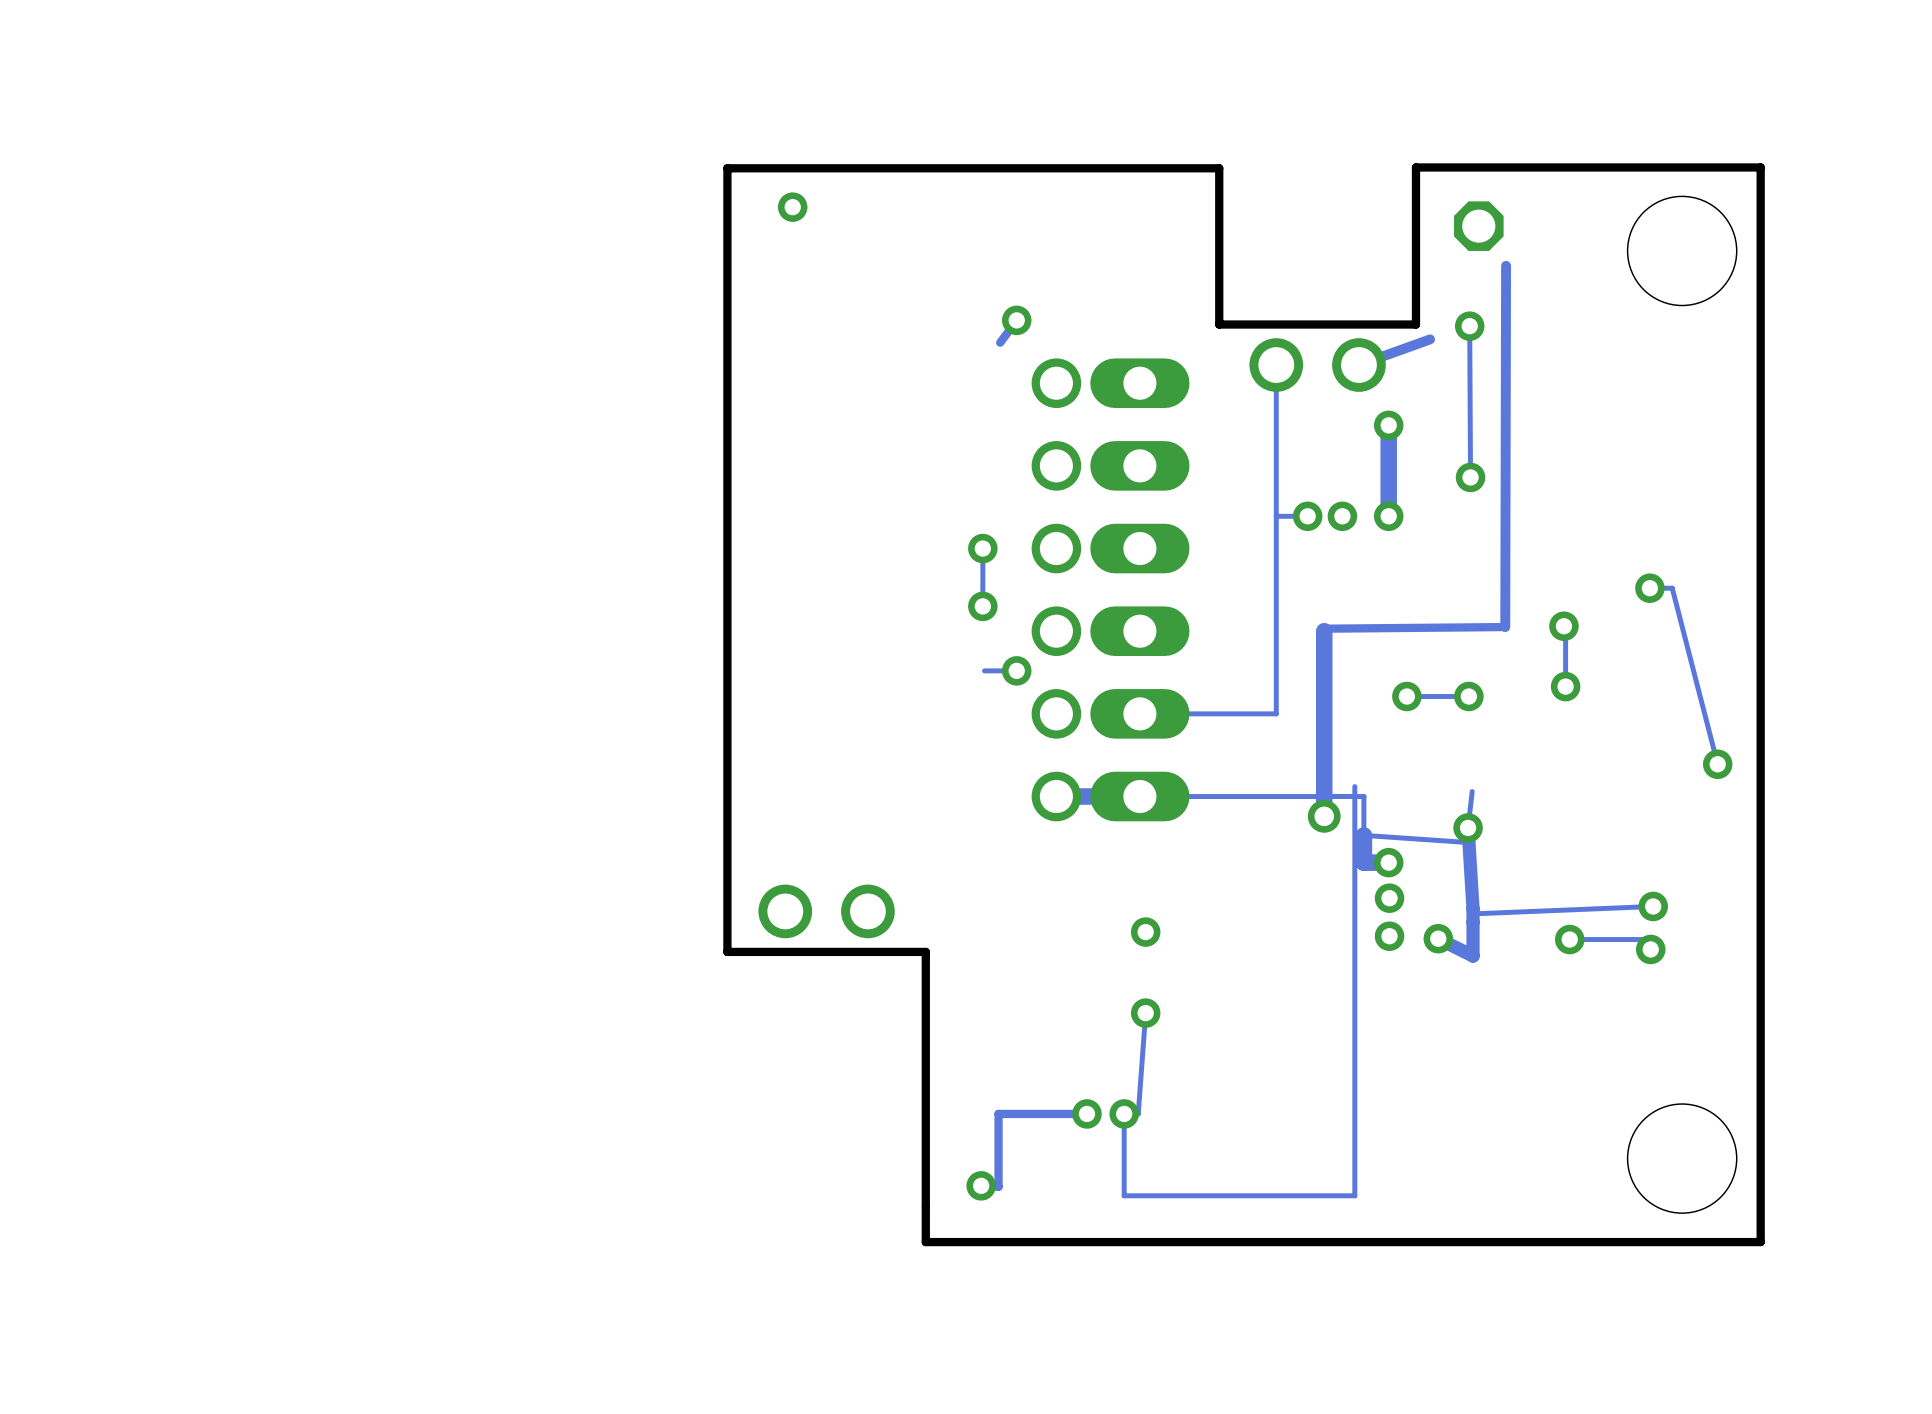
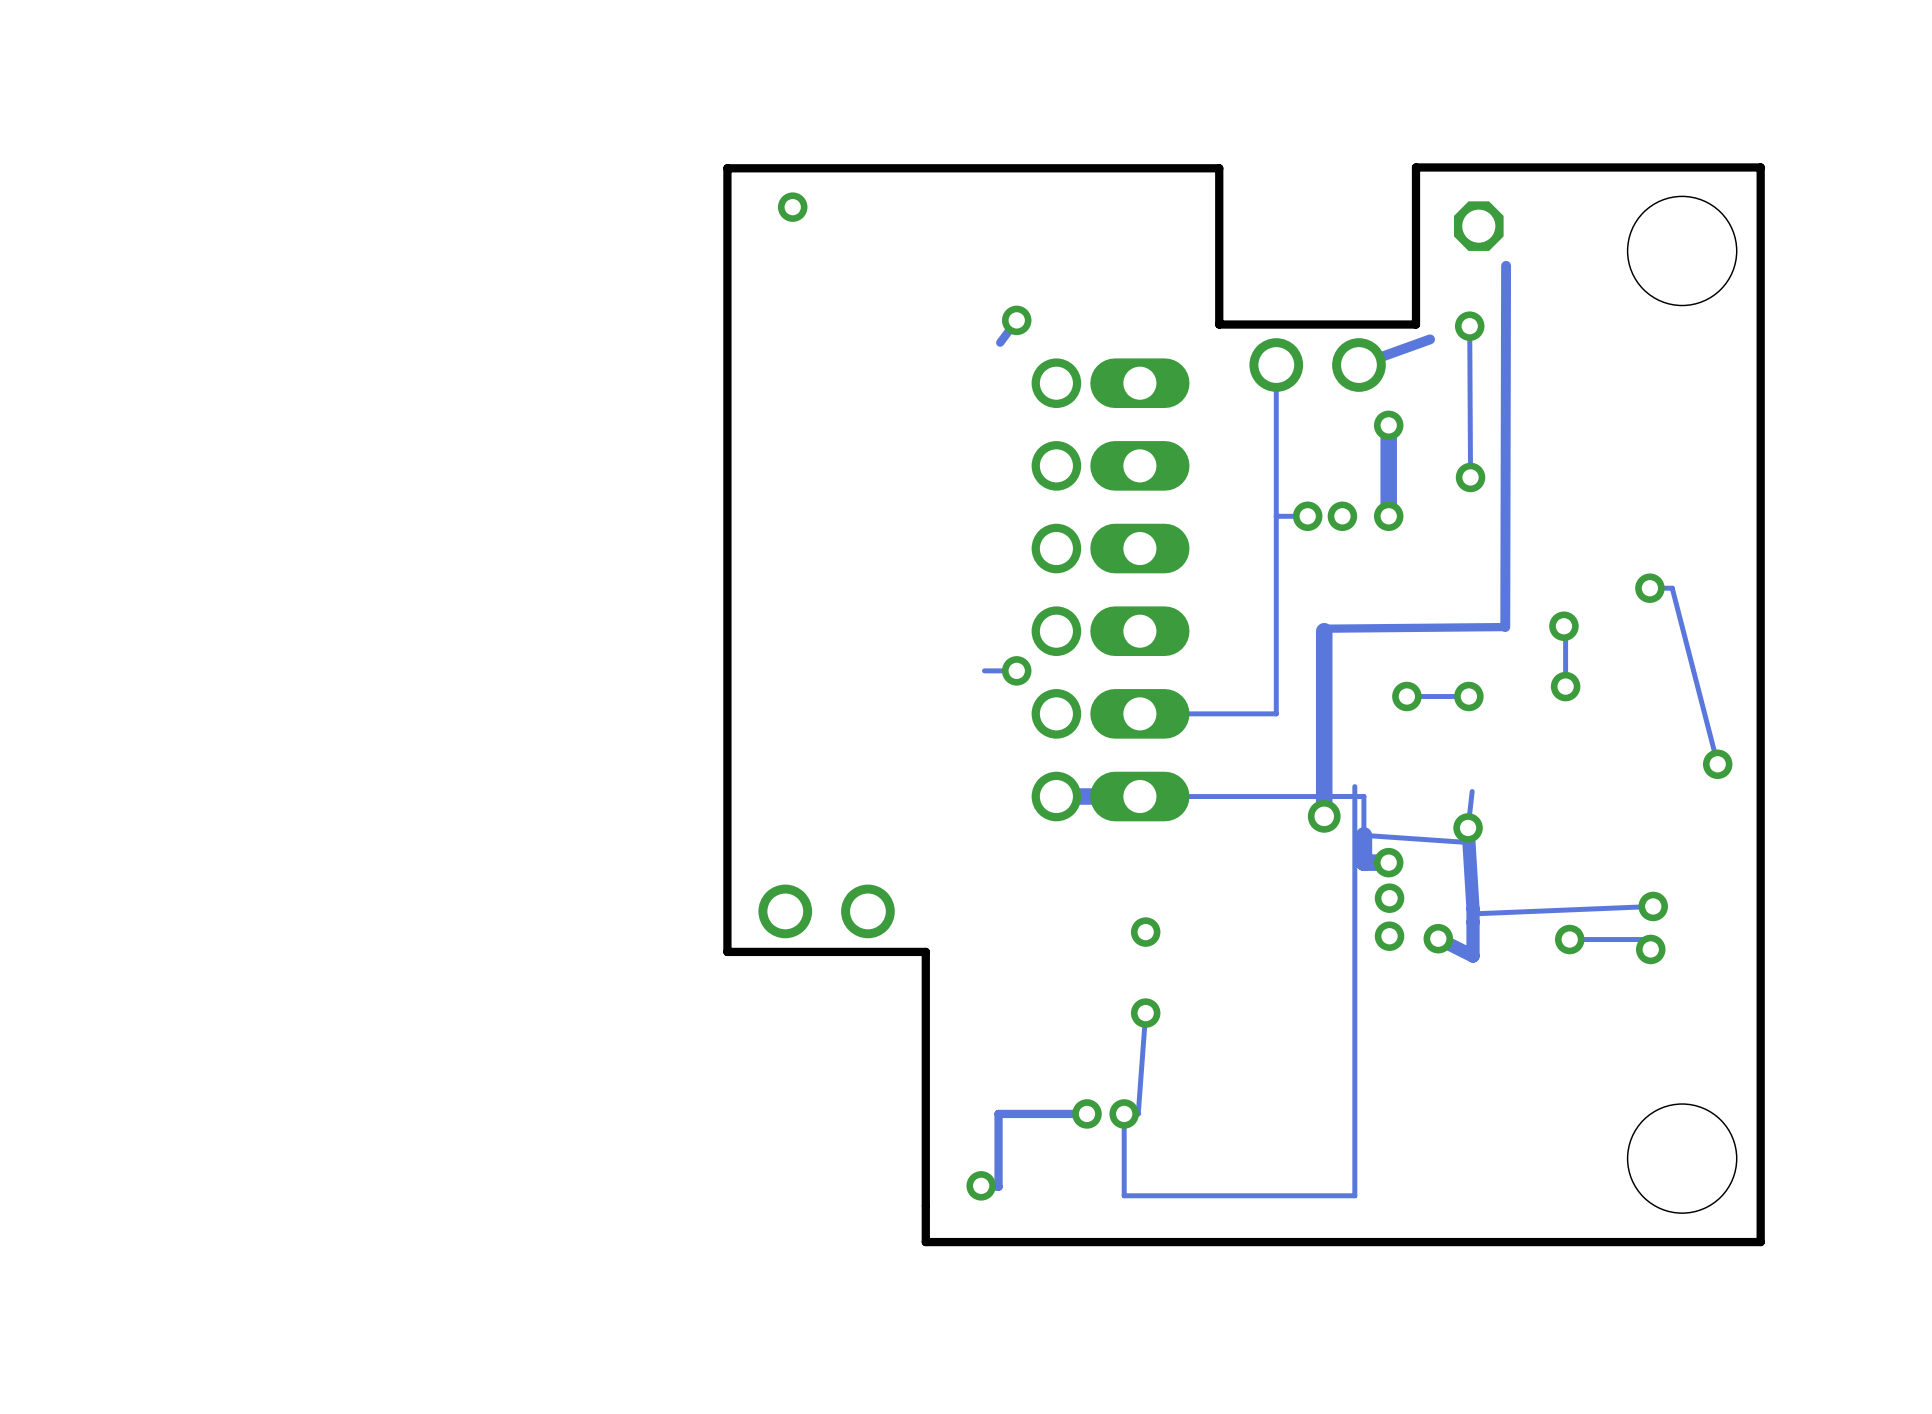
track: (982, 548) (982, 606) -> none
via: (982, 548) -> none
via: (982, 606) -> none

